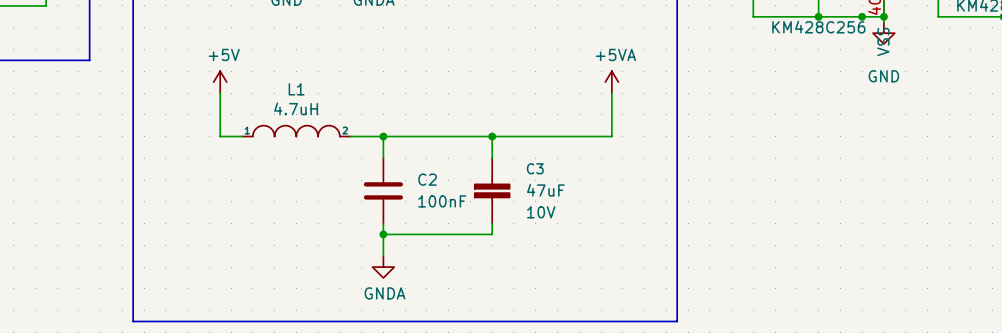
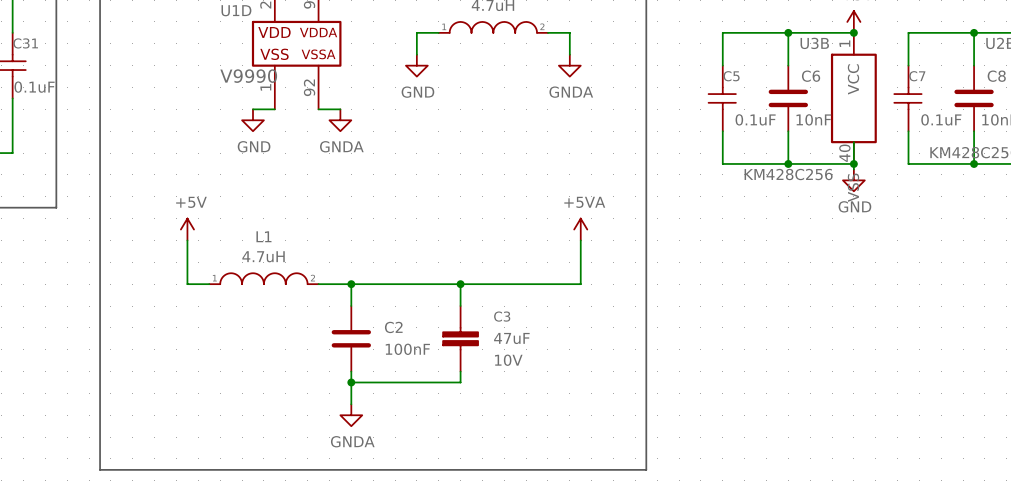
junction: (862, 16) -> none
power symbol text position: GND (883, 76) -> GND (854, 206)

